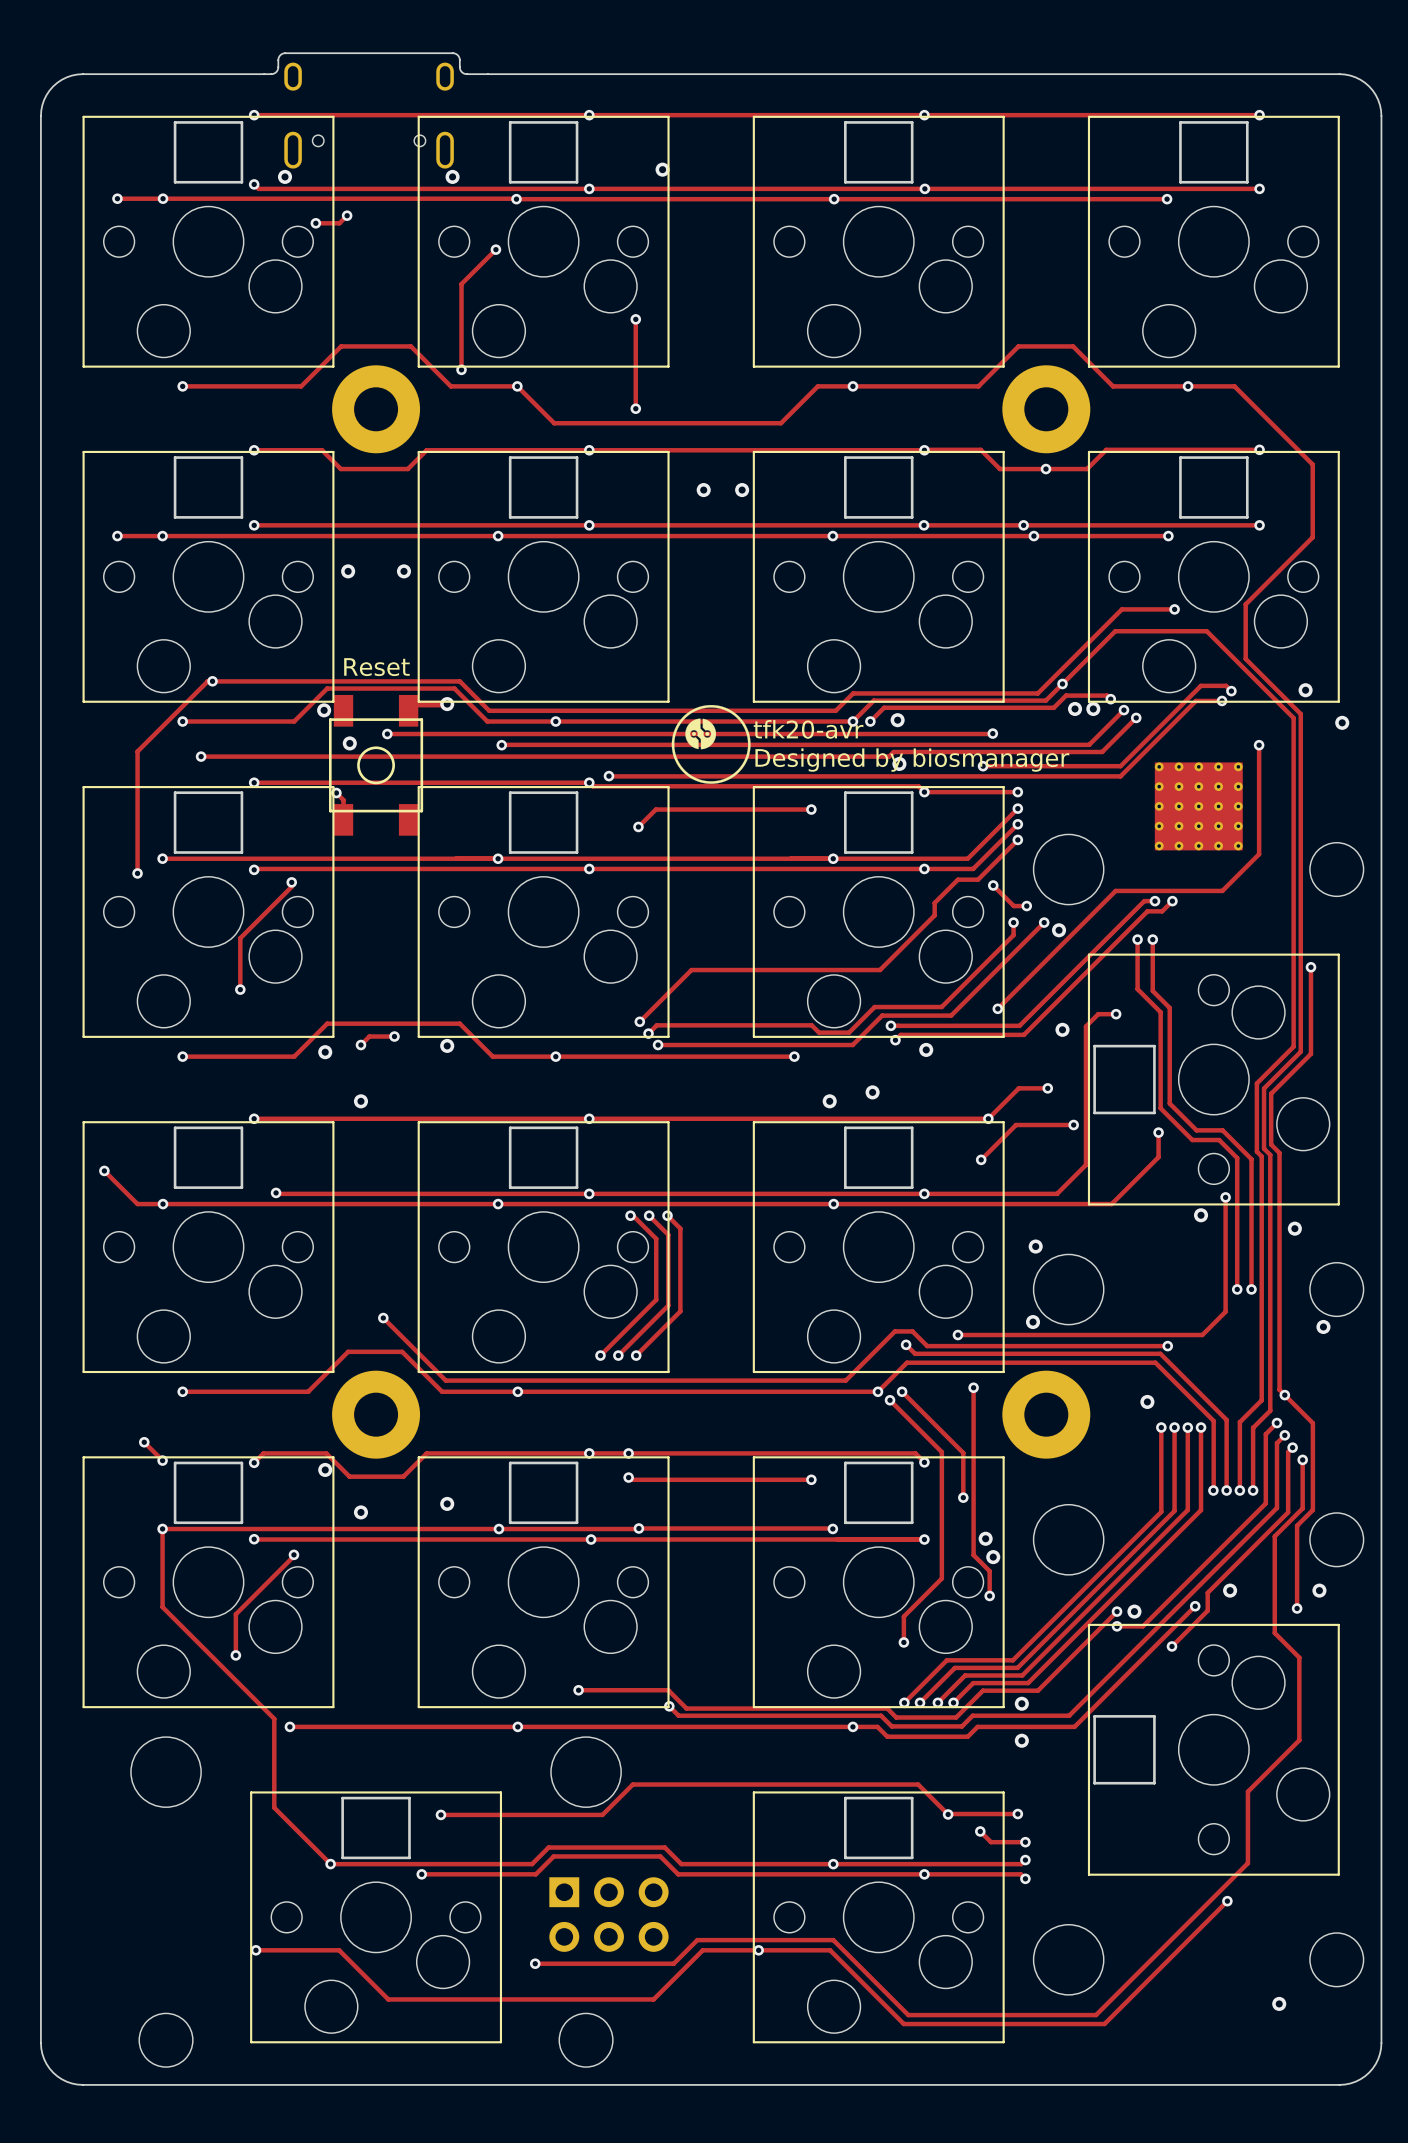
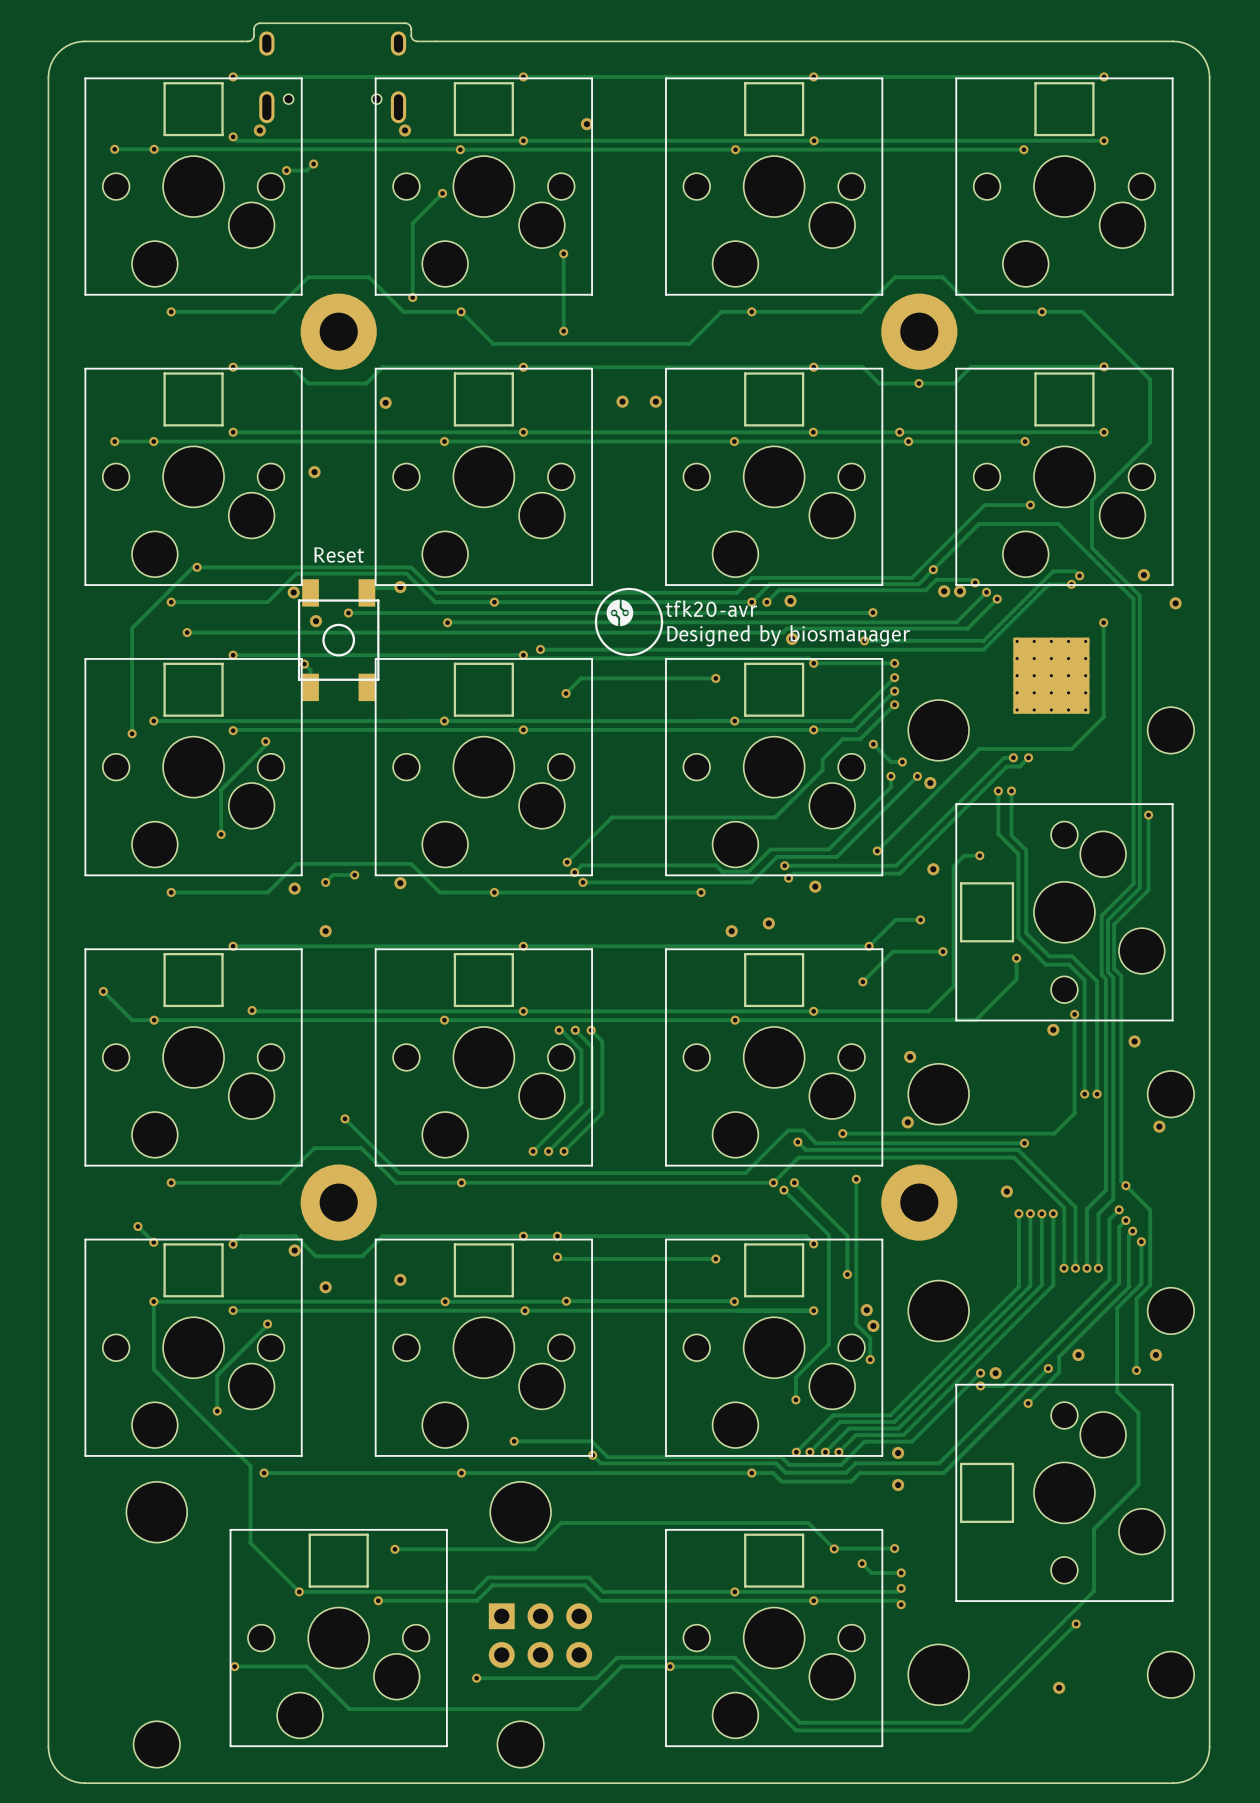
via position: (403, 571) -> (385, 402)
via position: (1279, 2003) -> (1059, 1687)

